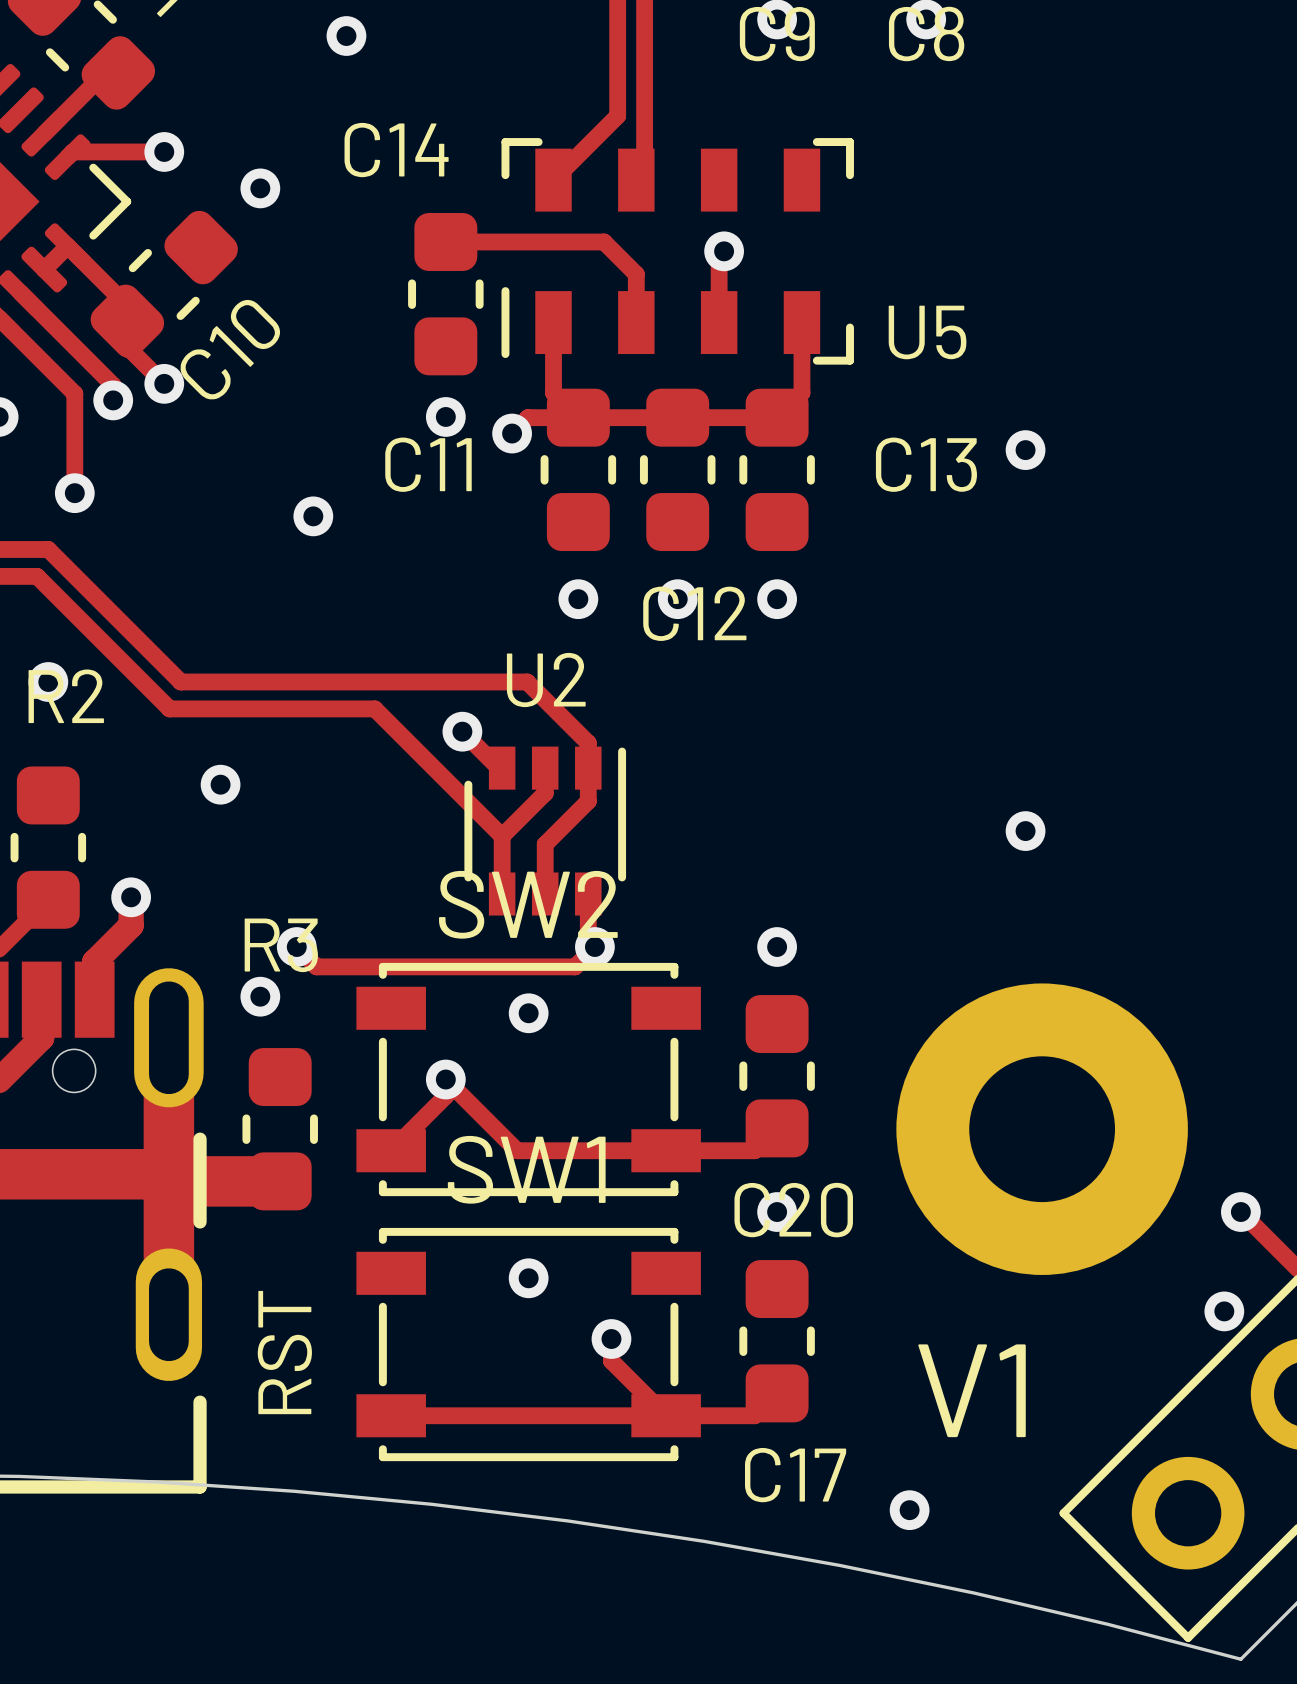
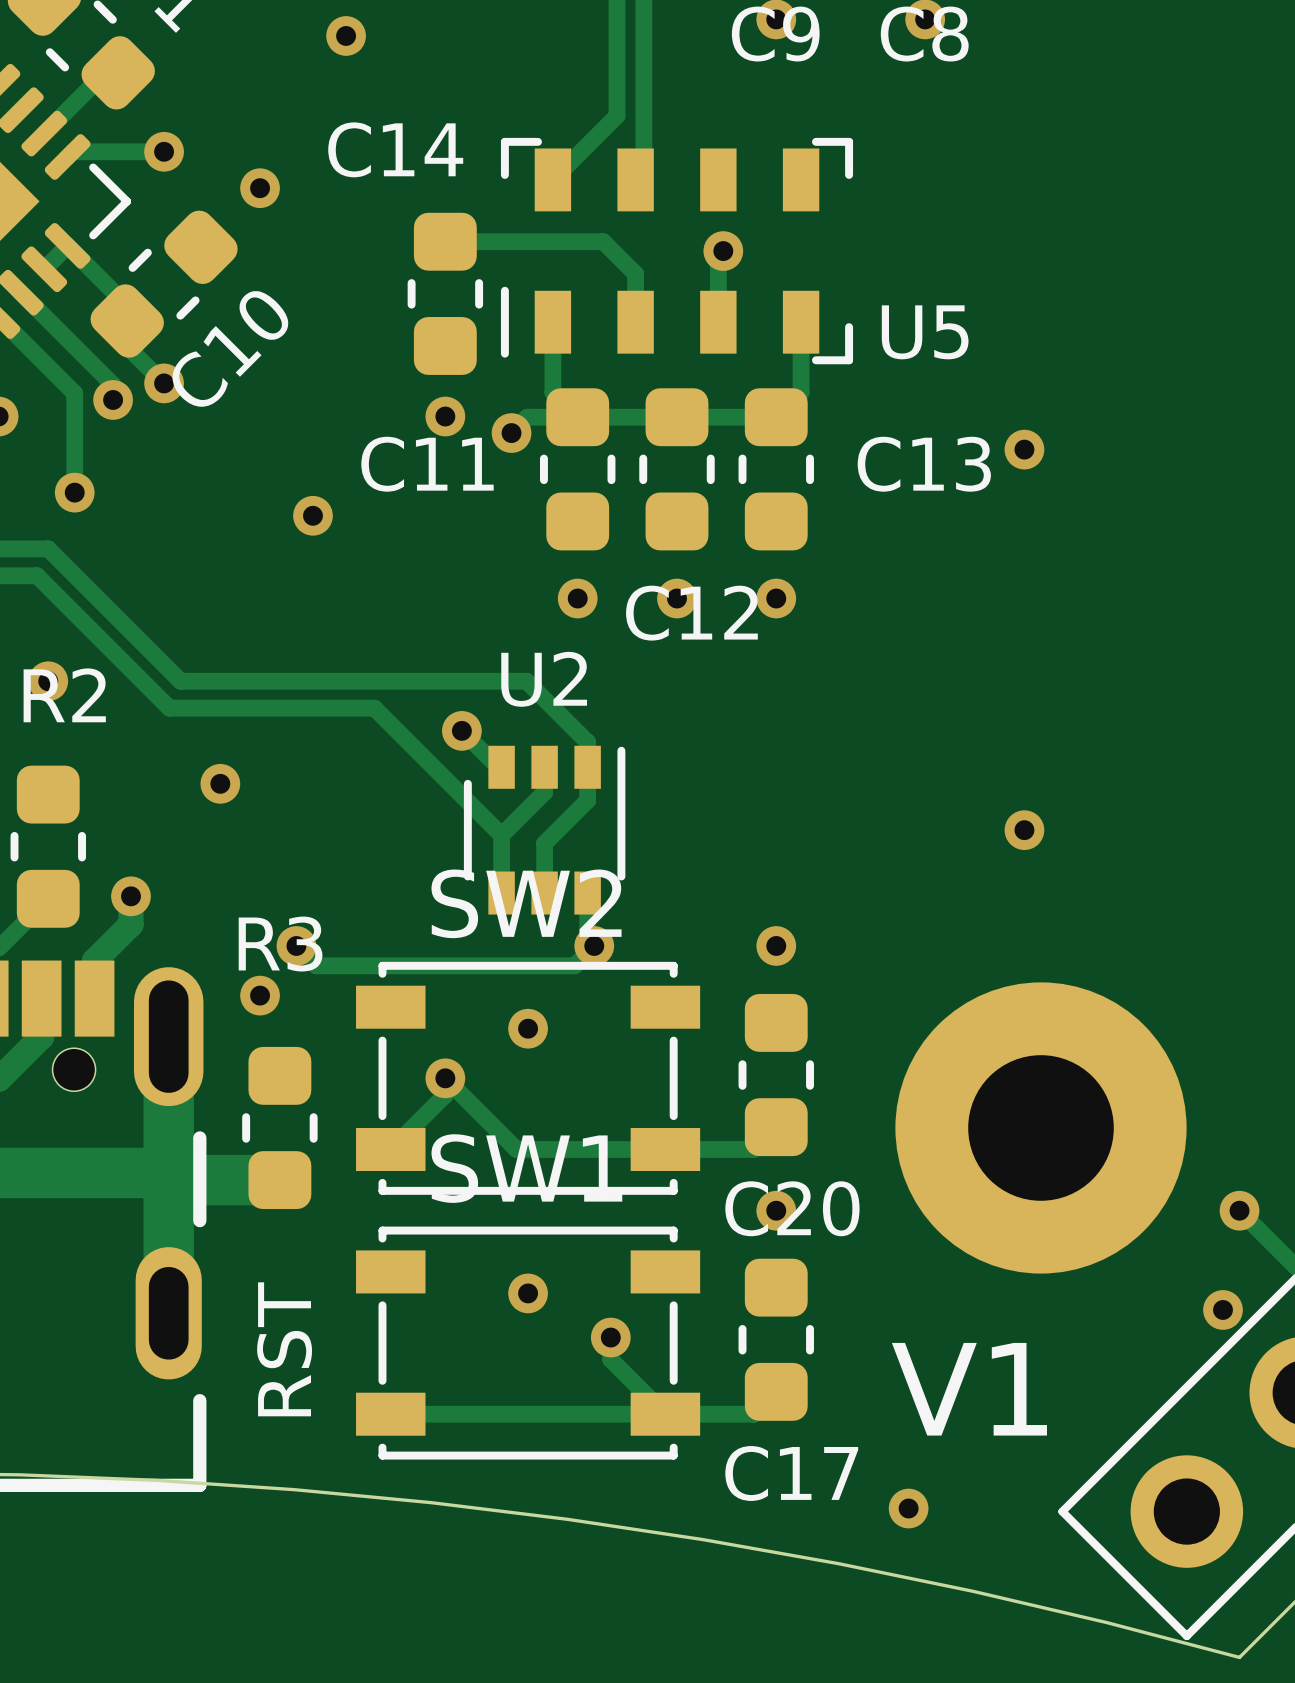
via position: (528, 1013) -> (528, 1028)
via position: (528, 1278) -> (528, 1293)

